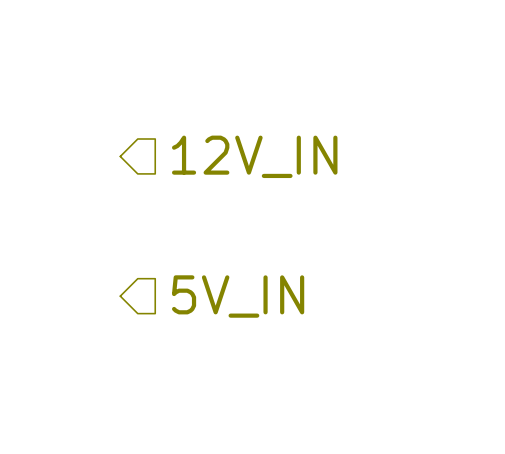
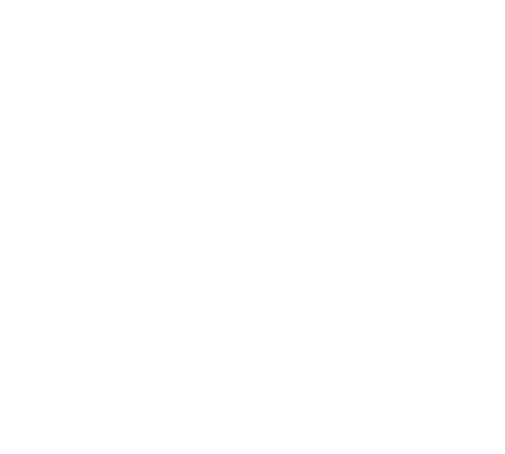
hierarchical label: 12V_IN (254, 156) -> none
hierarchical label: 5V_IN (238, 296) -> none

